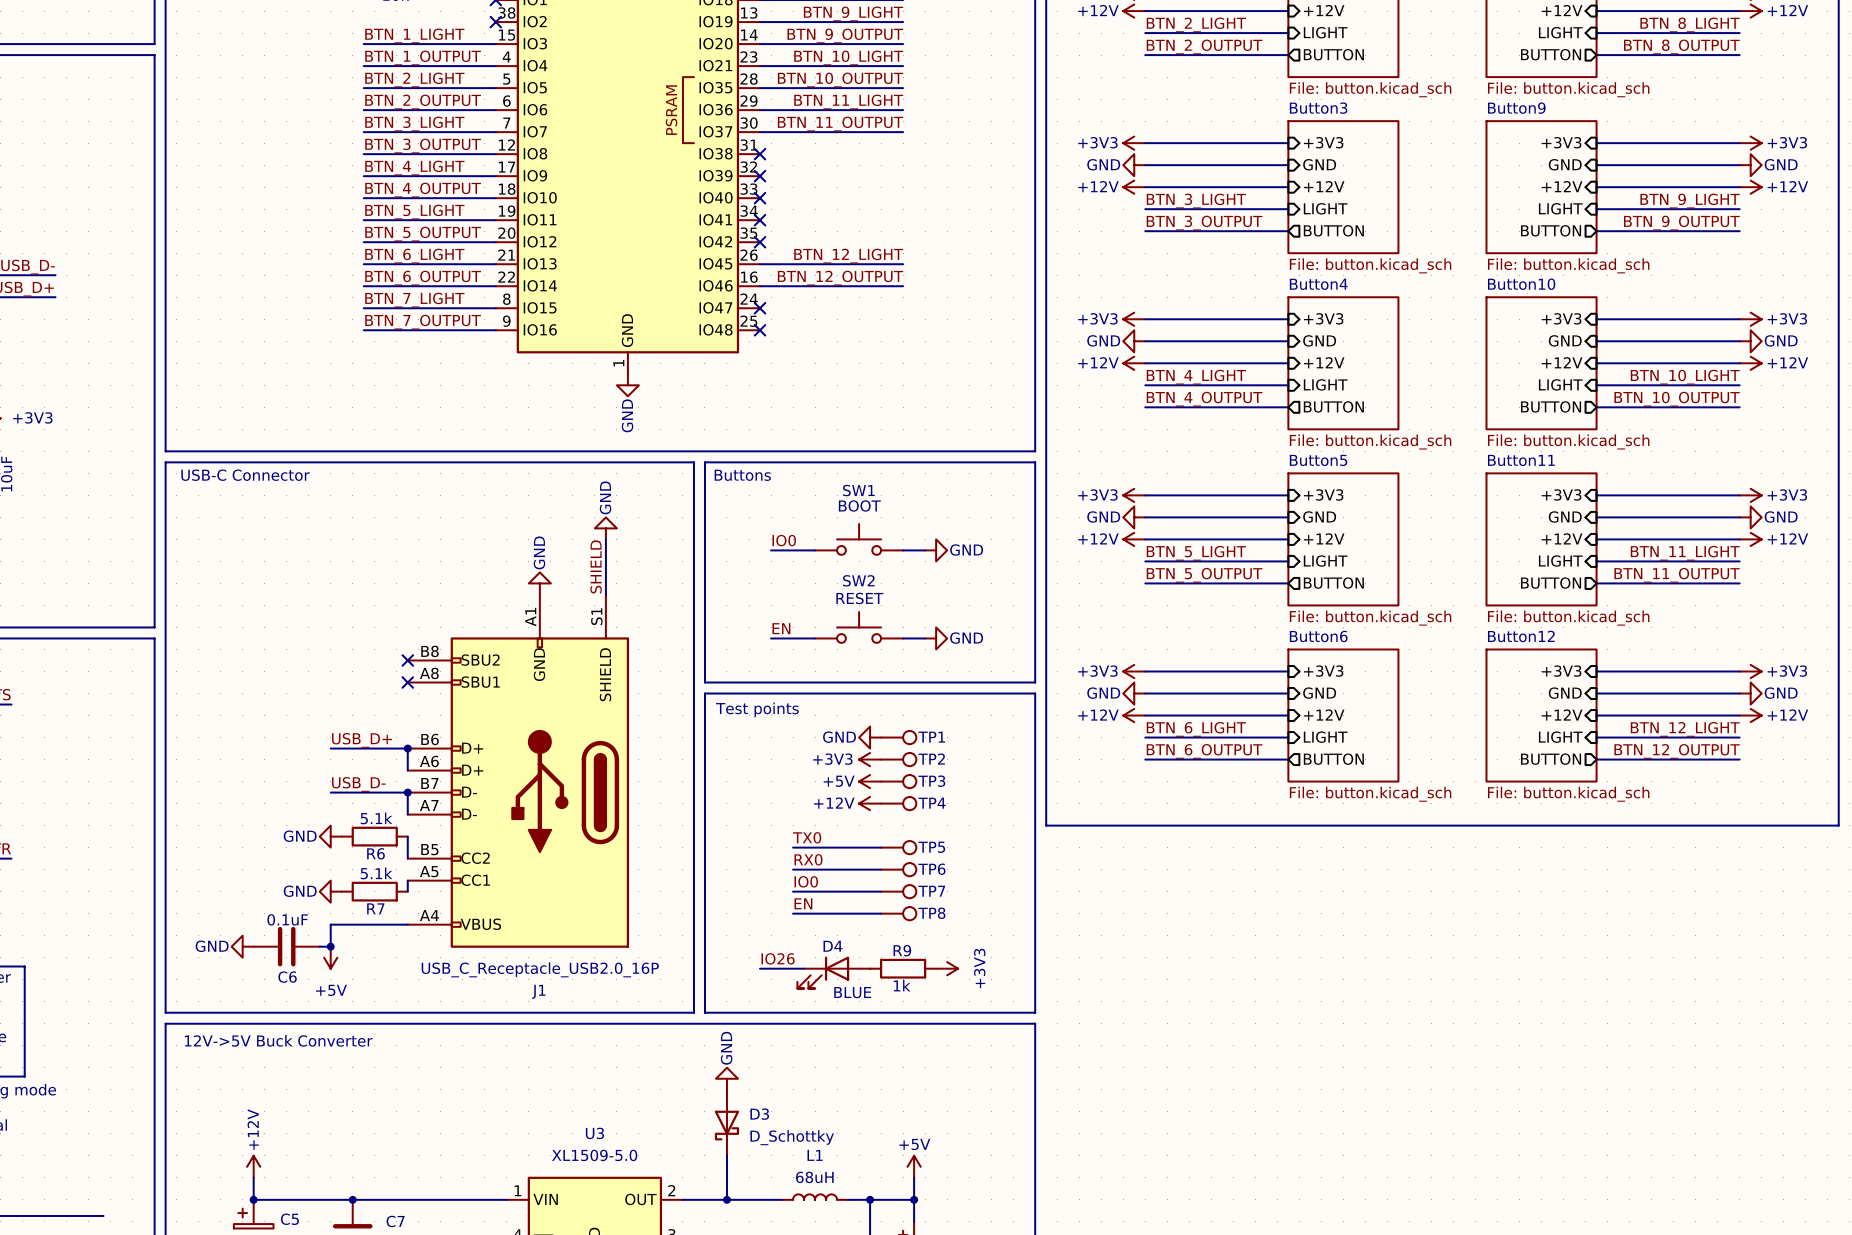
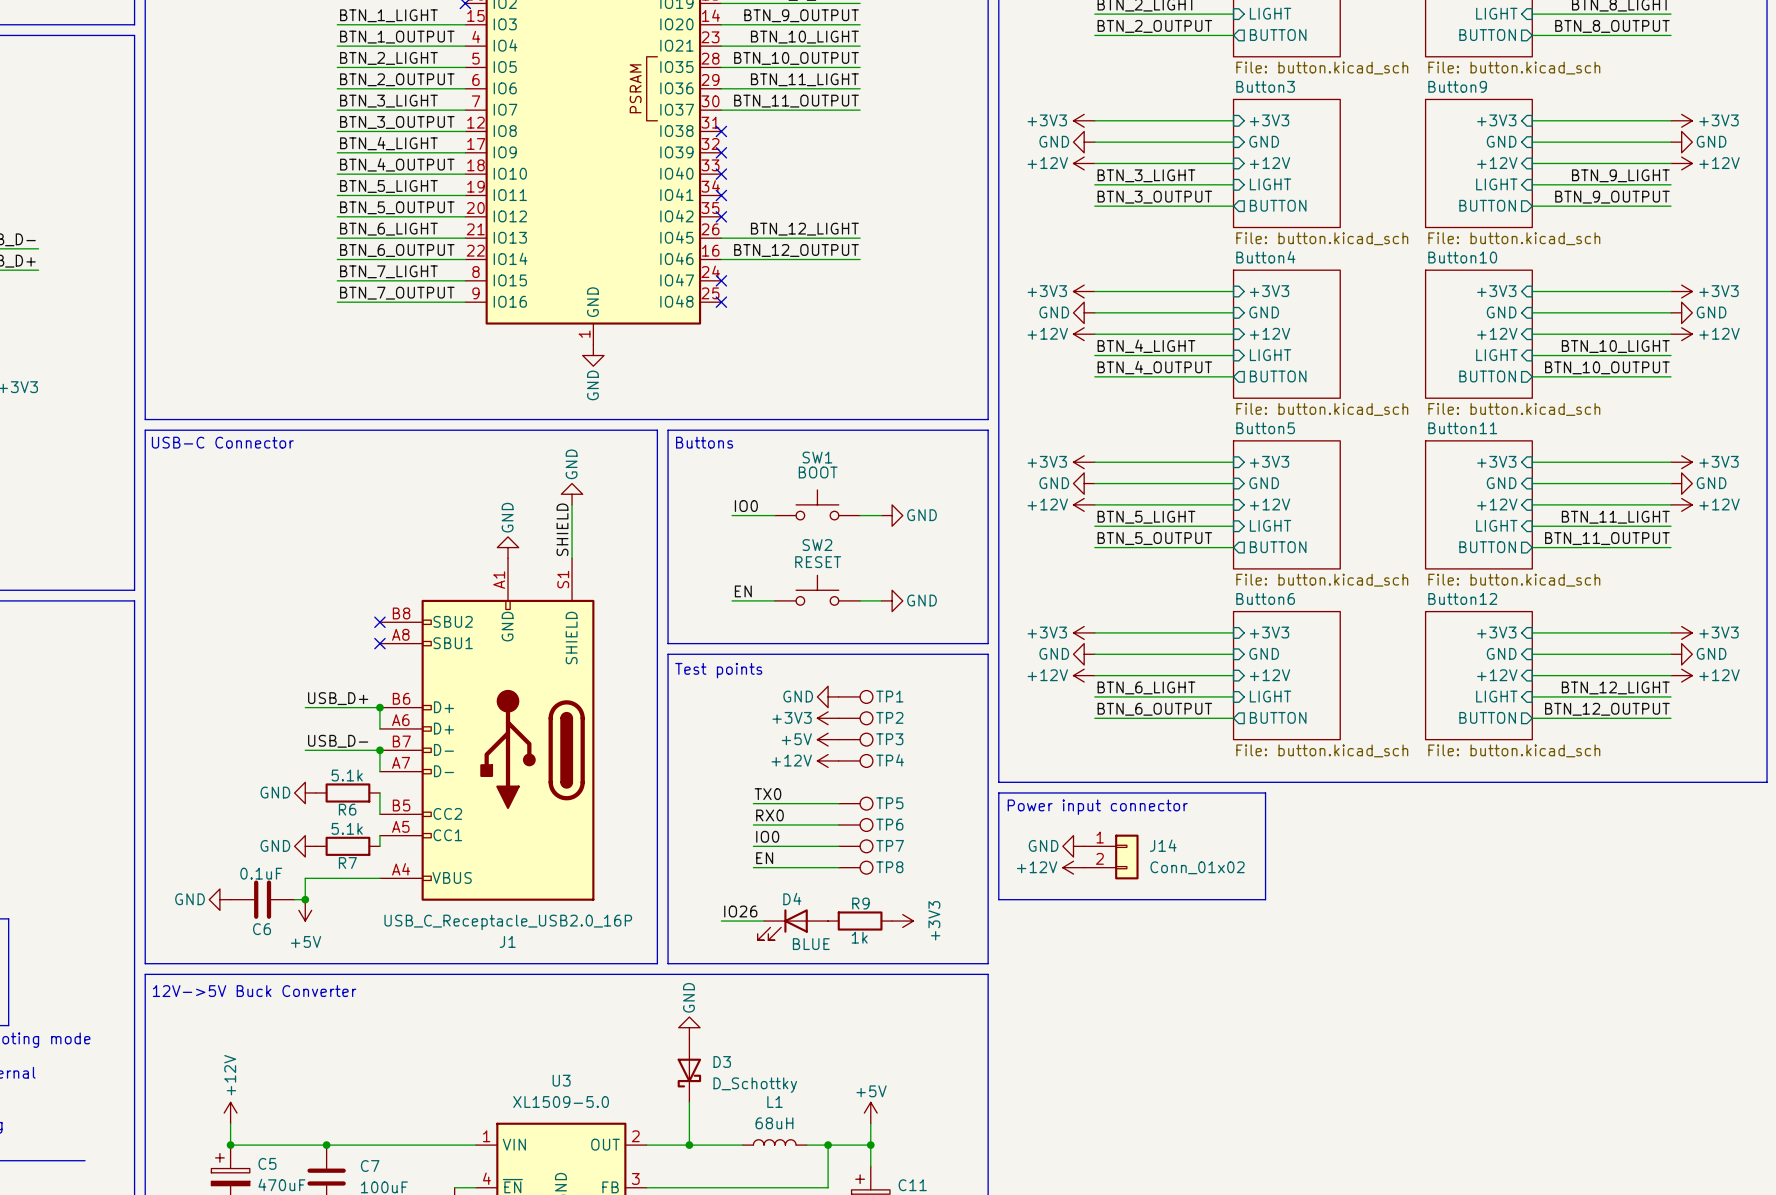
line: none -> (998, 792) (1265, 792) (1265, 899) (998, 899) (998, 792)
text: none -> Power input connector (1097, 807)
power symbol: none -> GND (1073, 846)
J14: none -> Conn_01x02 (1111, 857)
power symbol: none -> +12V (1073, 867)

